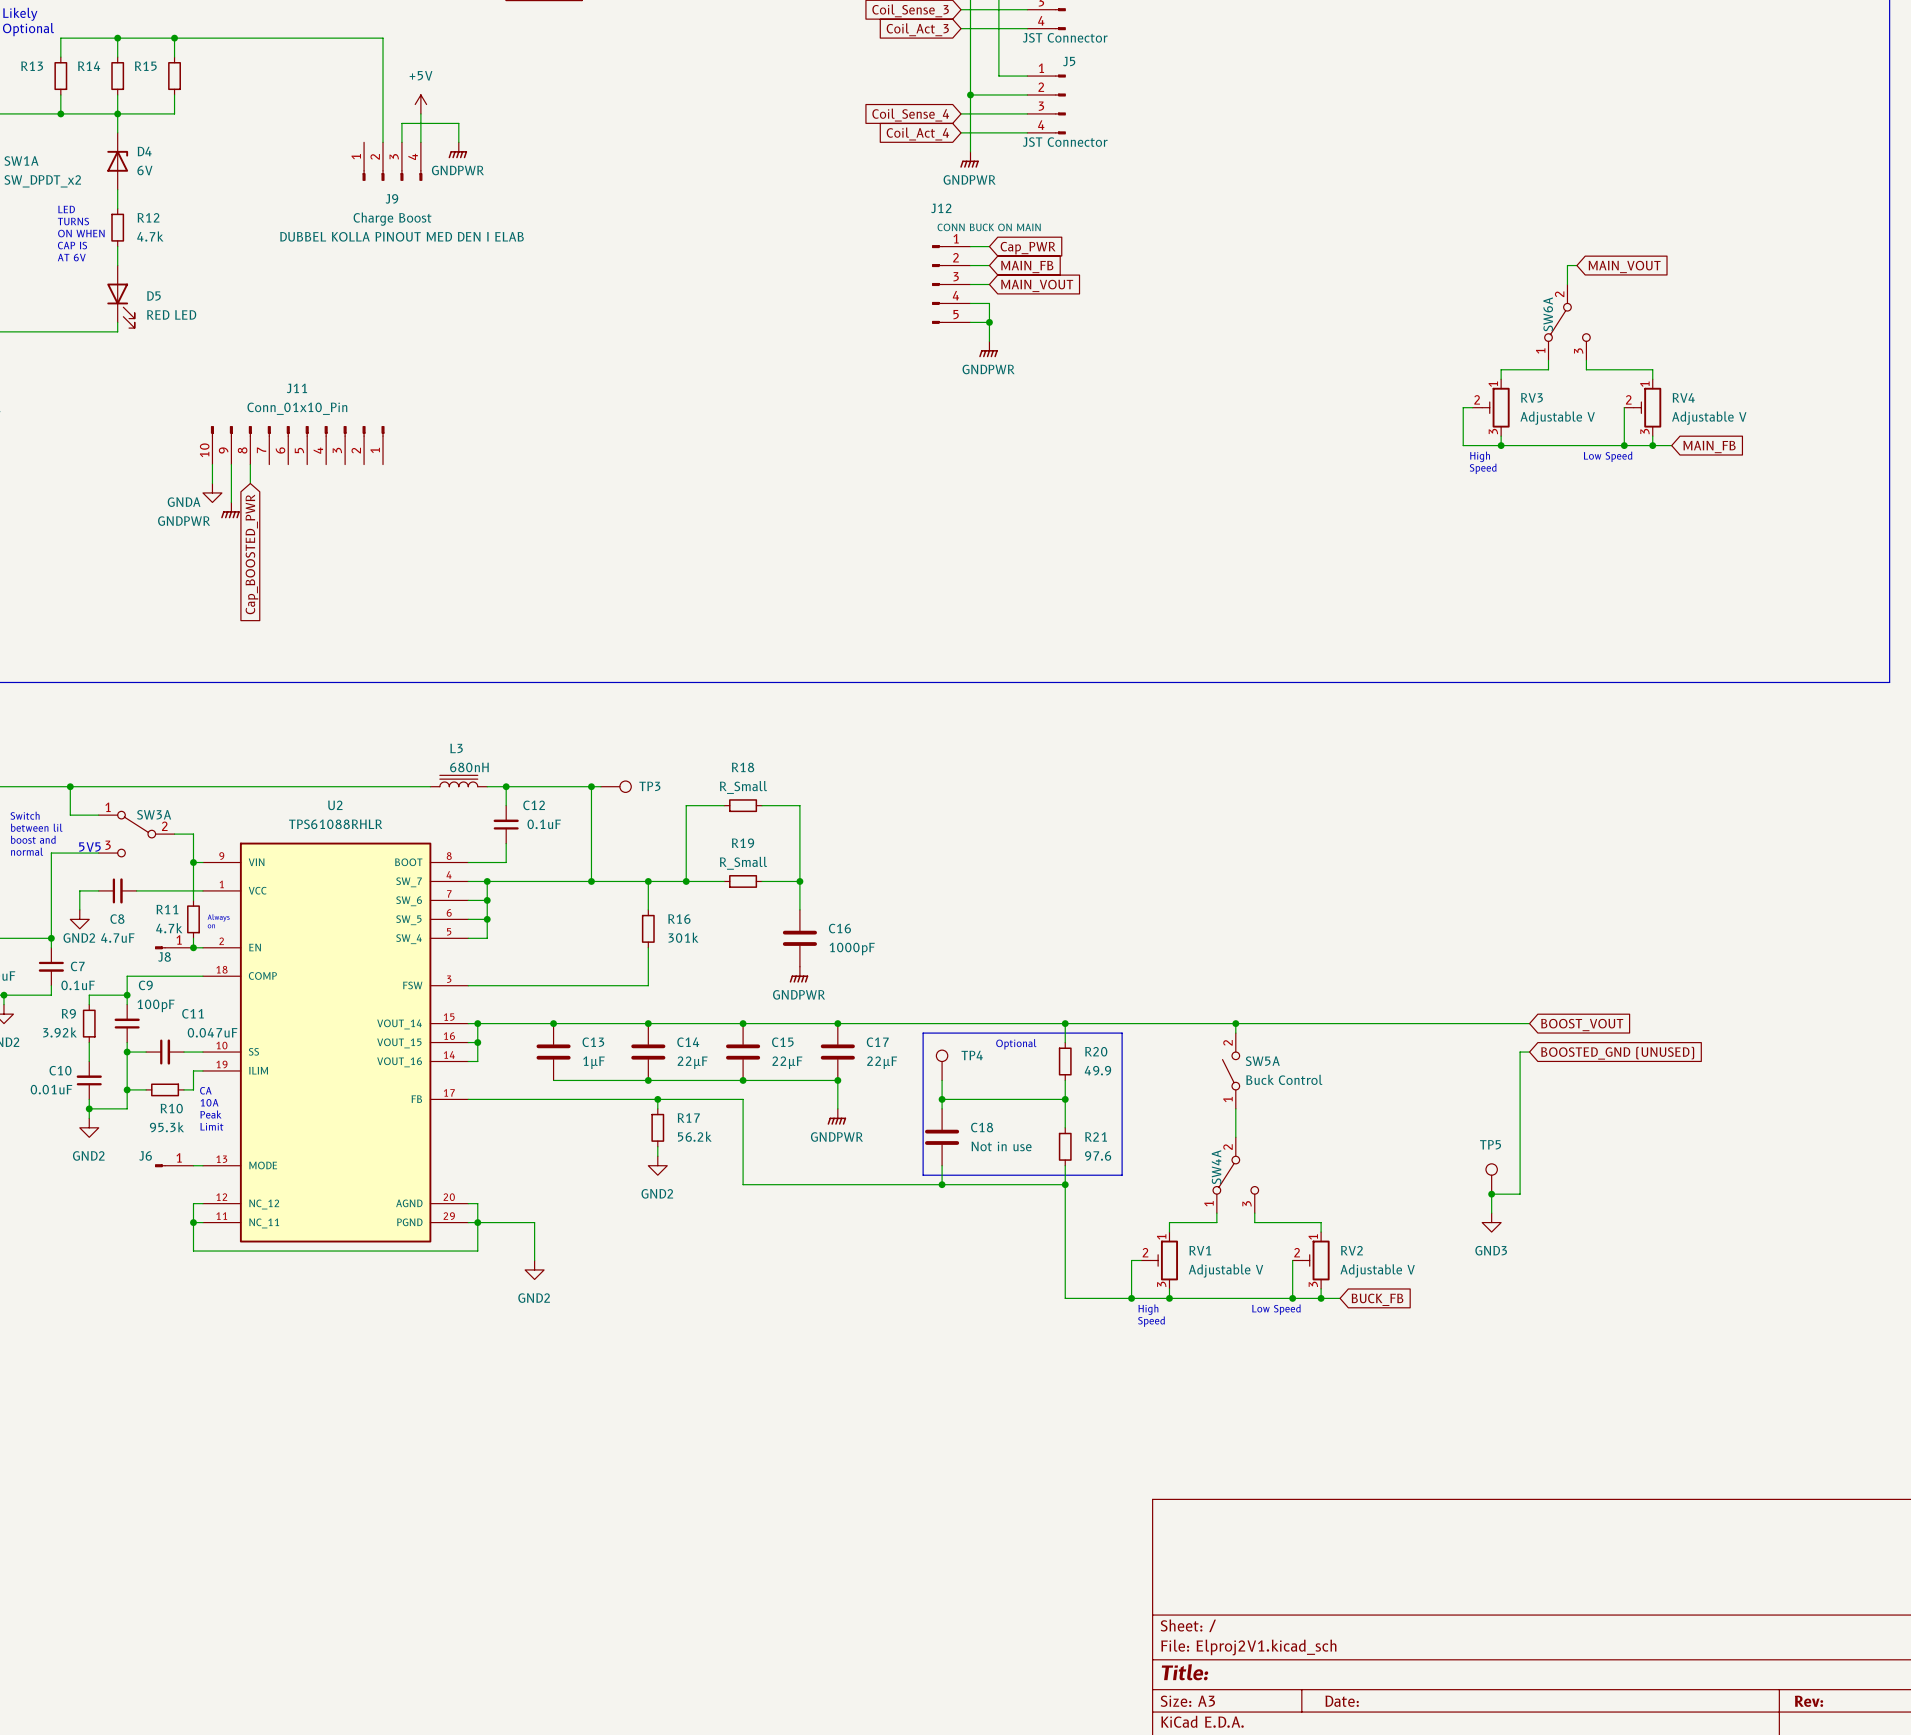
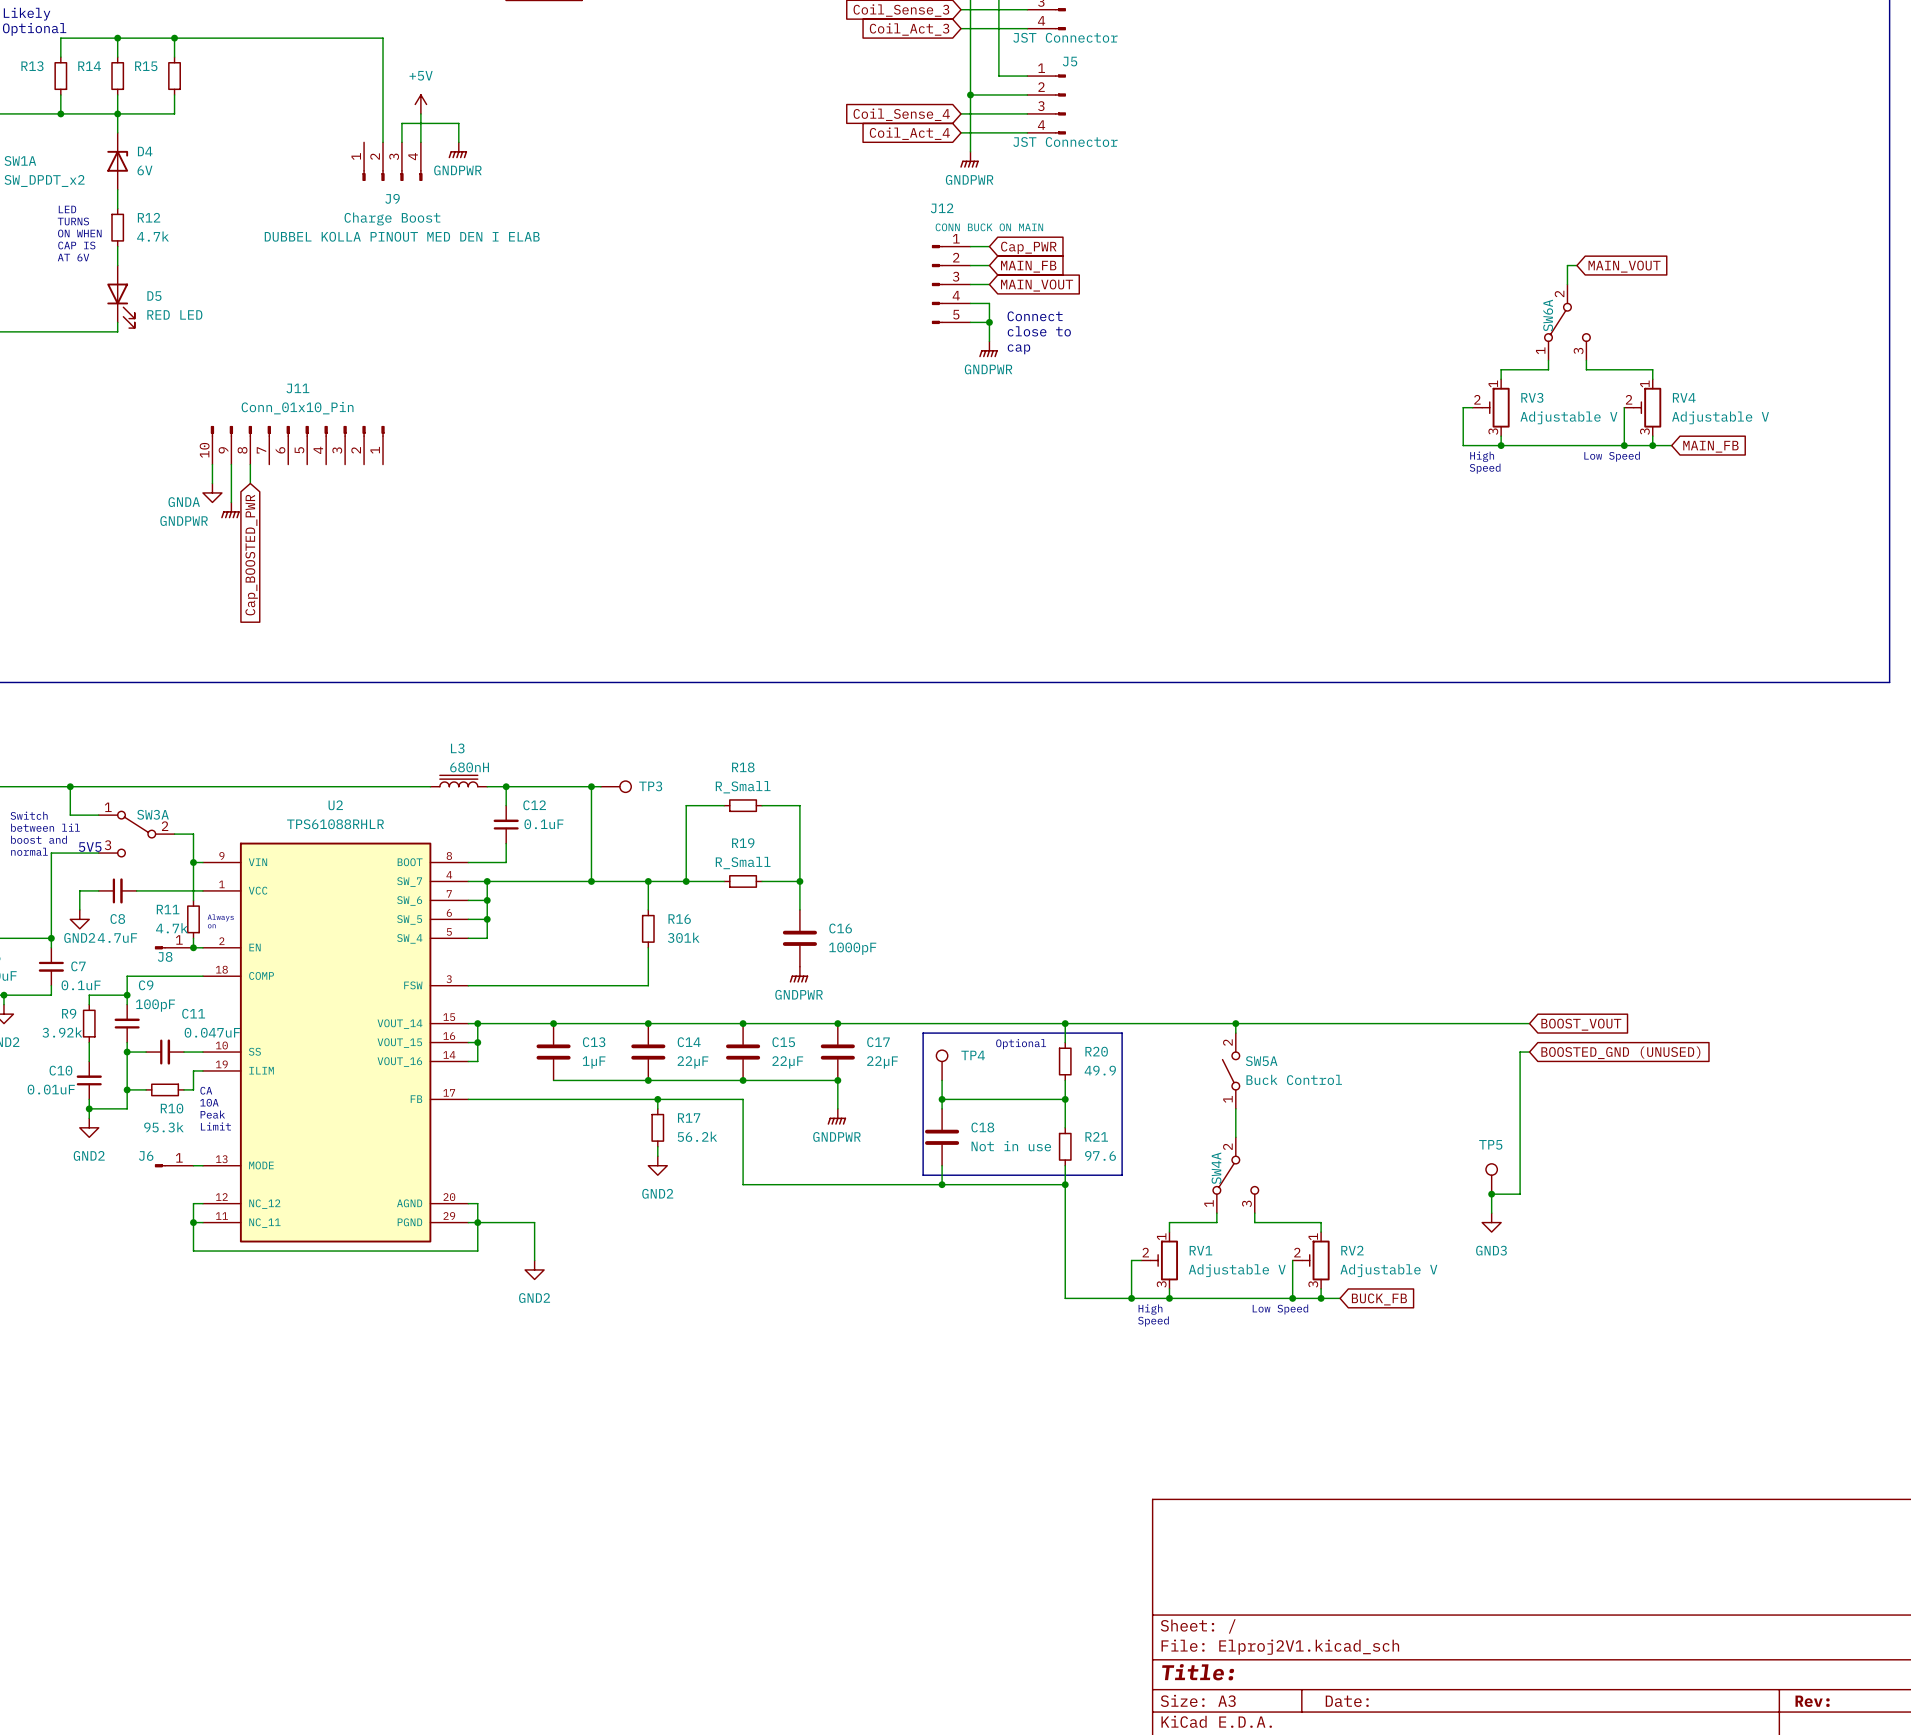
text: none -> Connect (1035, 316)
text: none -> close to (1039, 331)
text: none -> cap (1018, 349)

